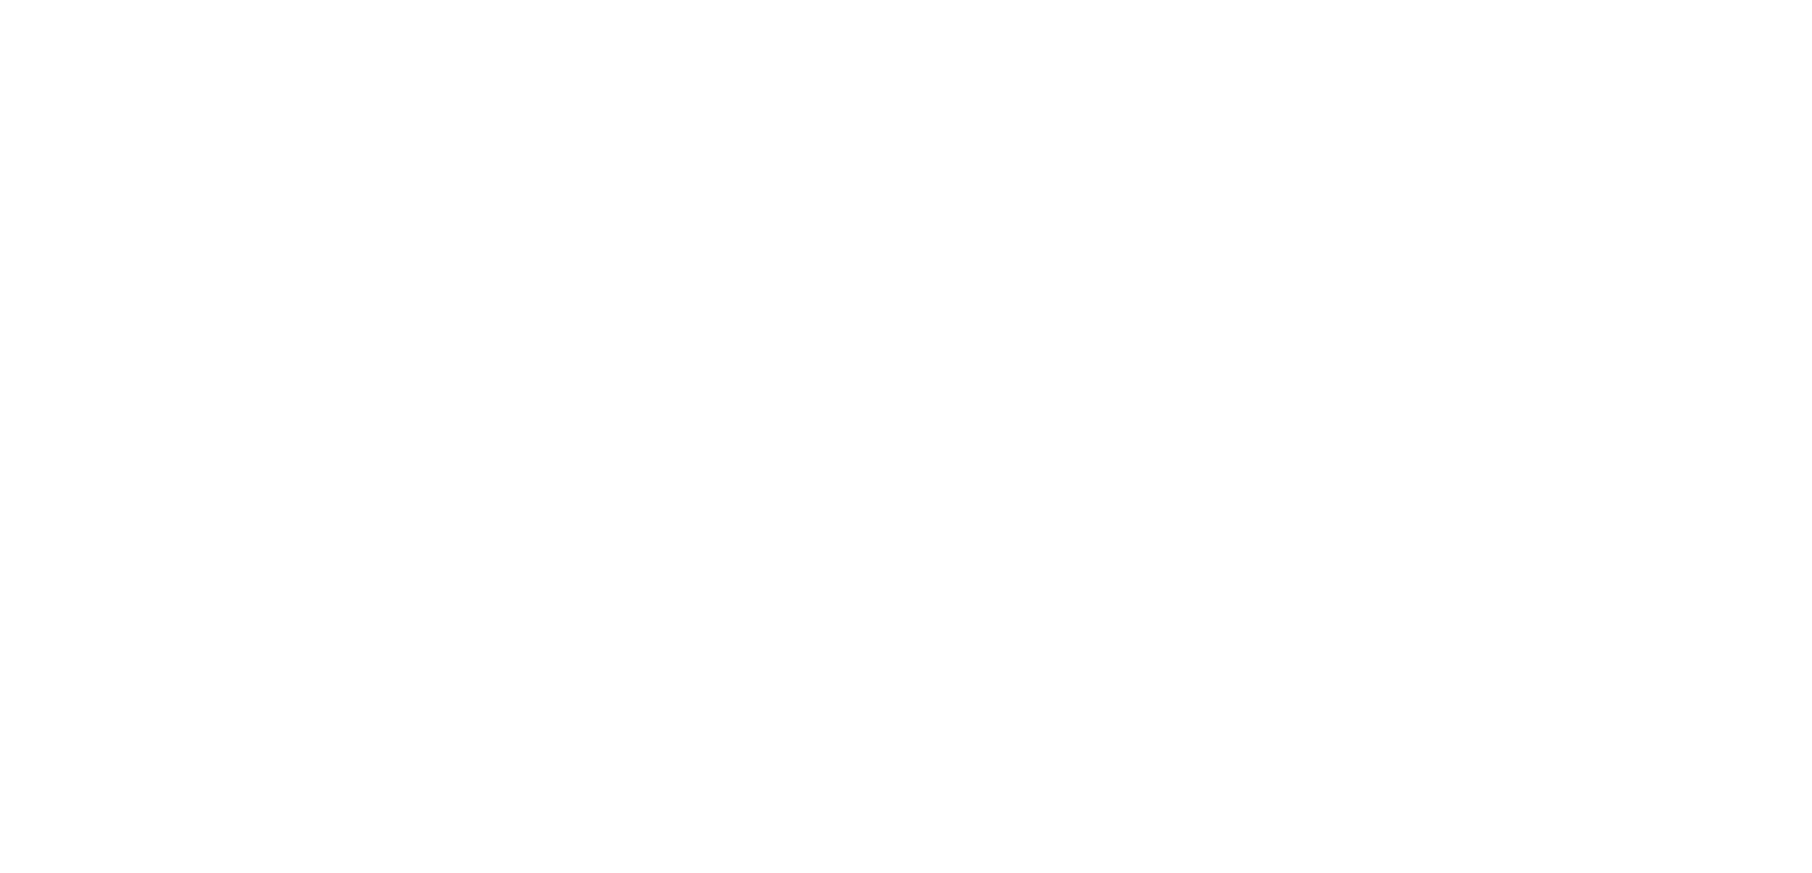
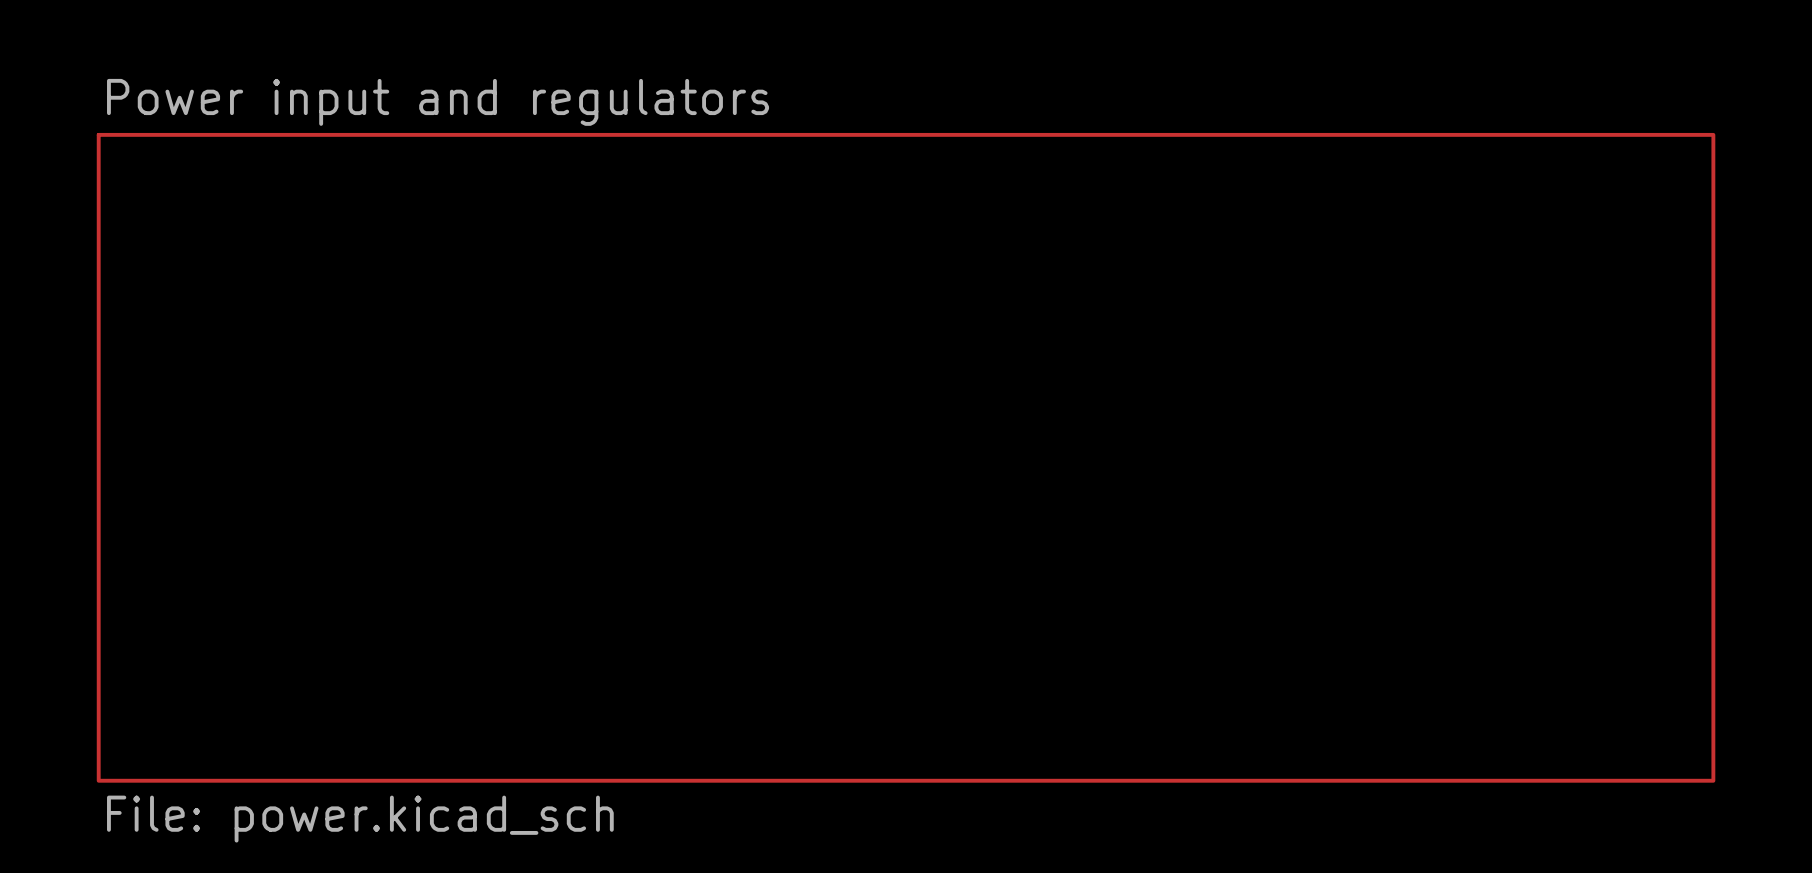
sheet Power input and regulators: none -> File: power.kicad_sch (906, 457)

